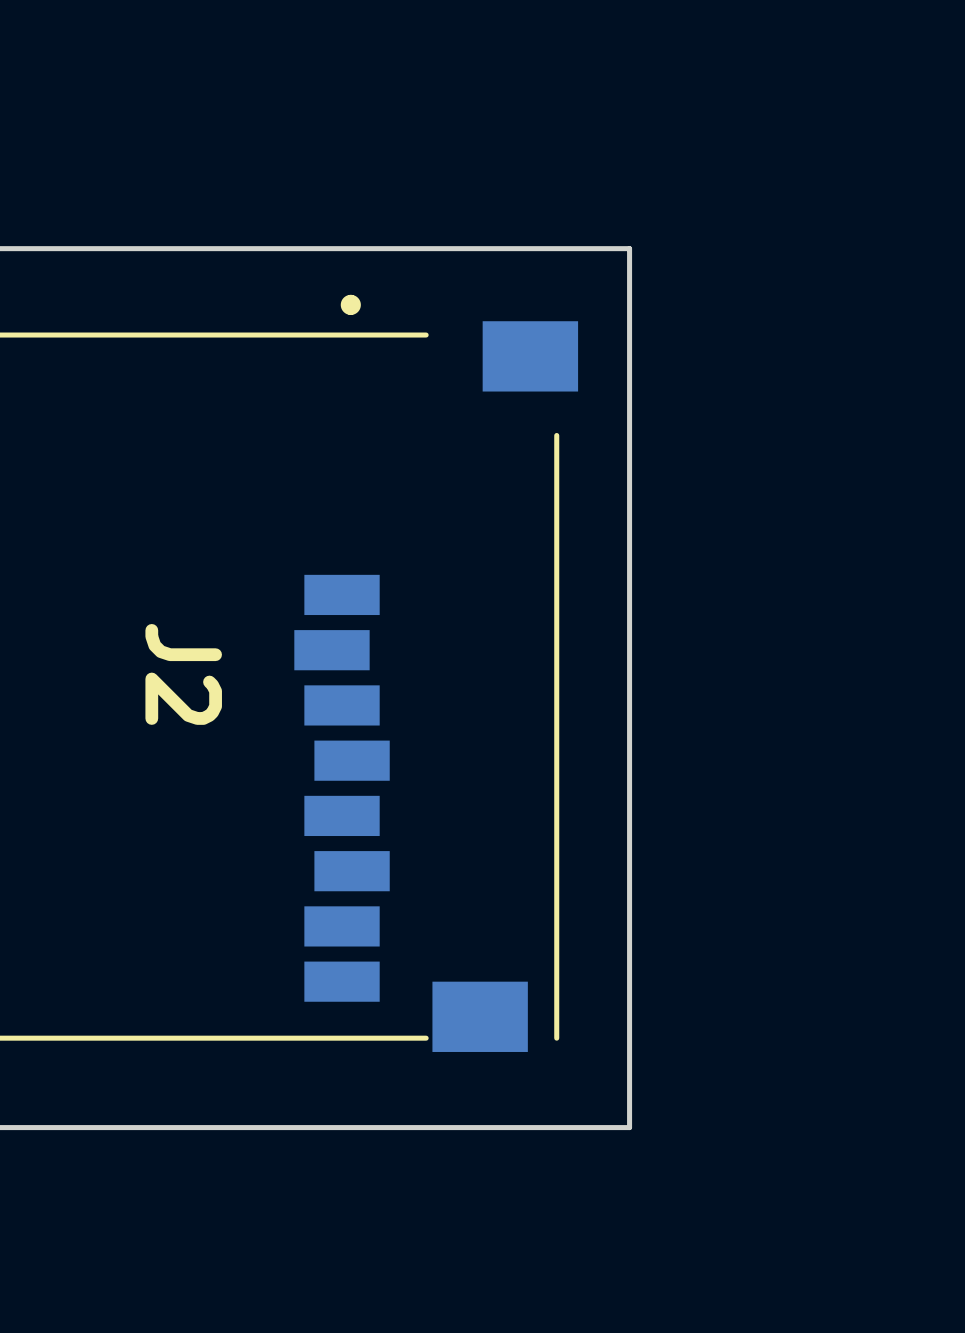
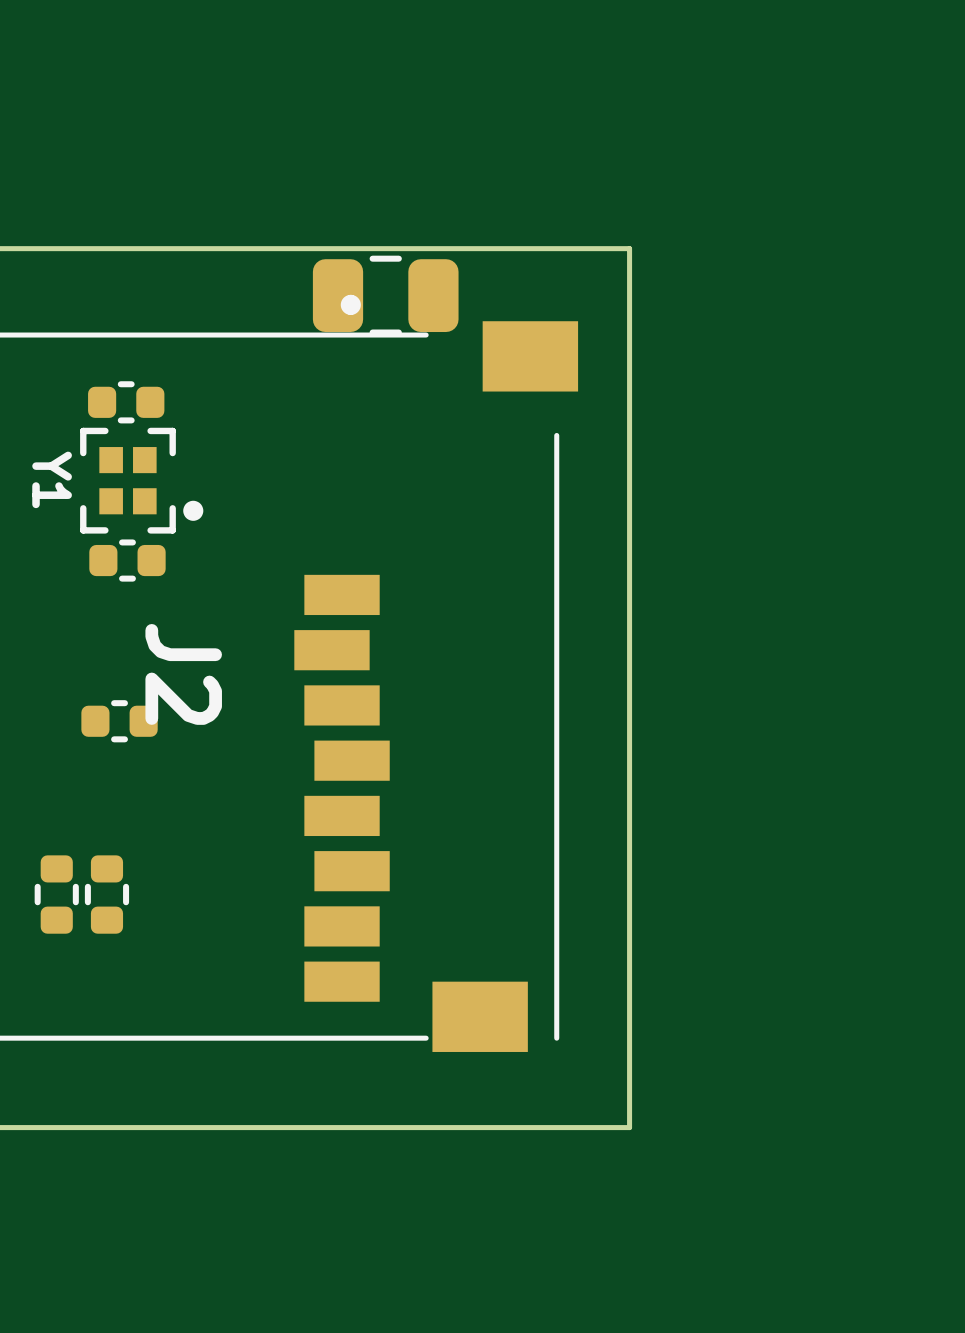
part: none -> (385, 295)
part: none -> (126, 402)
Y1: none -> (141, 480)
part: none -> (127, 560)
part: none -> (119, 721)
part: none -> (56, 894)
part: none -> (106, 894)

